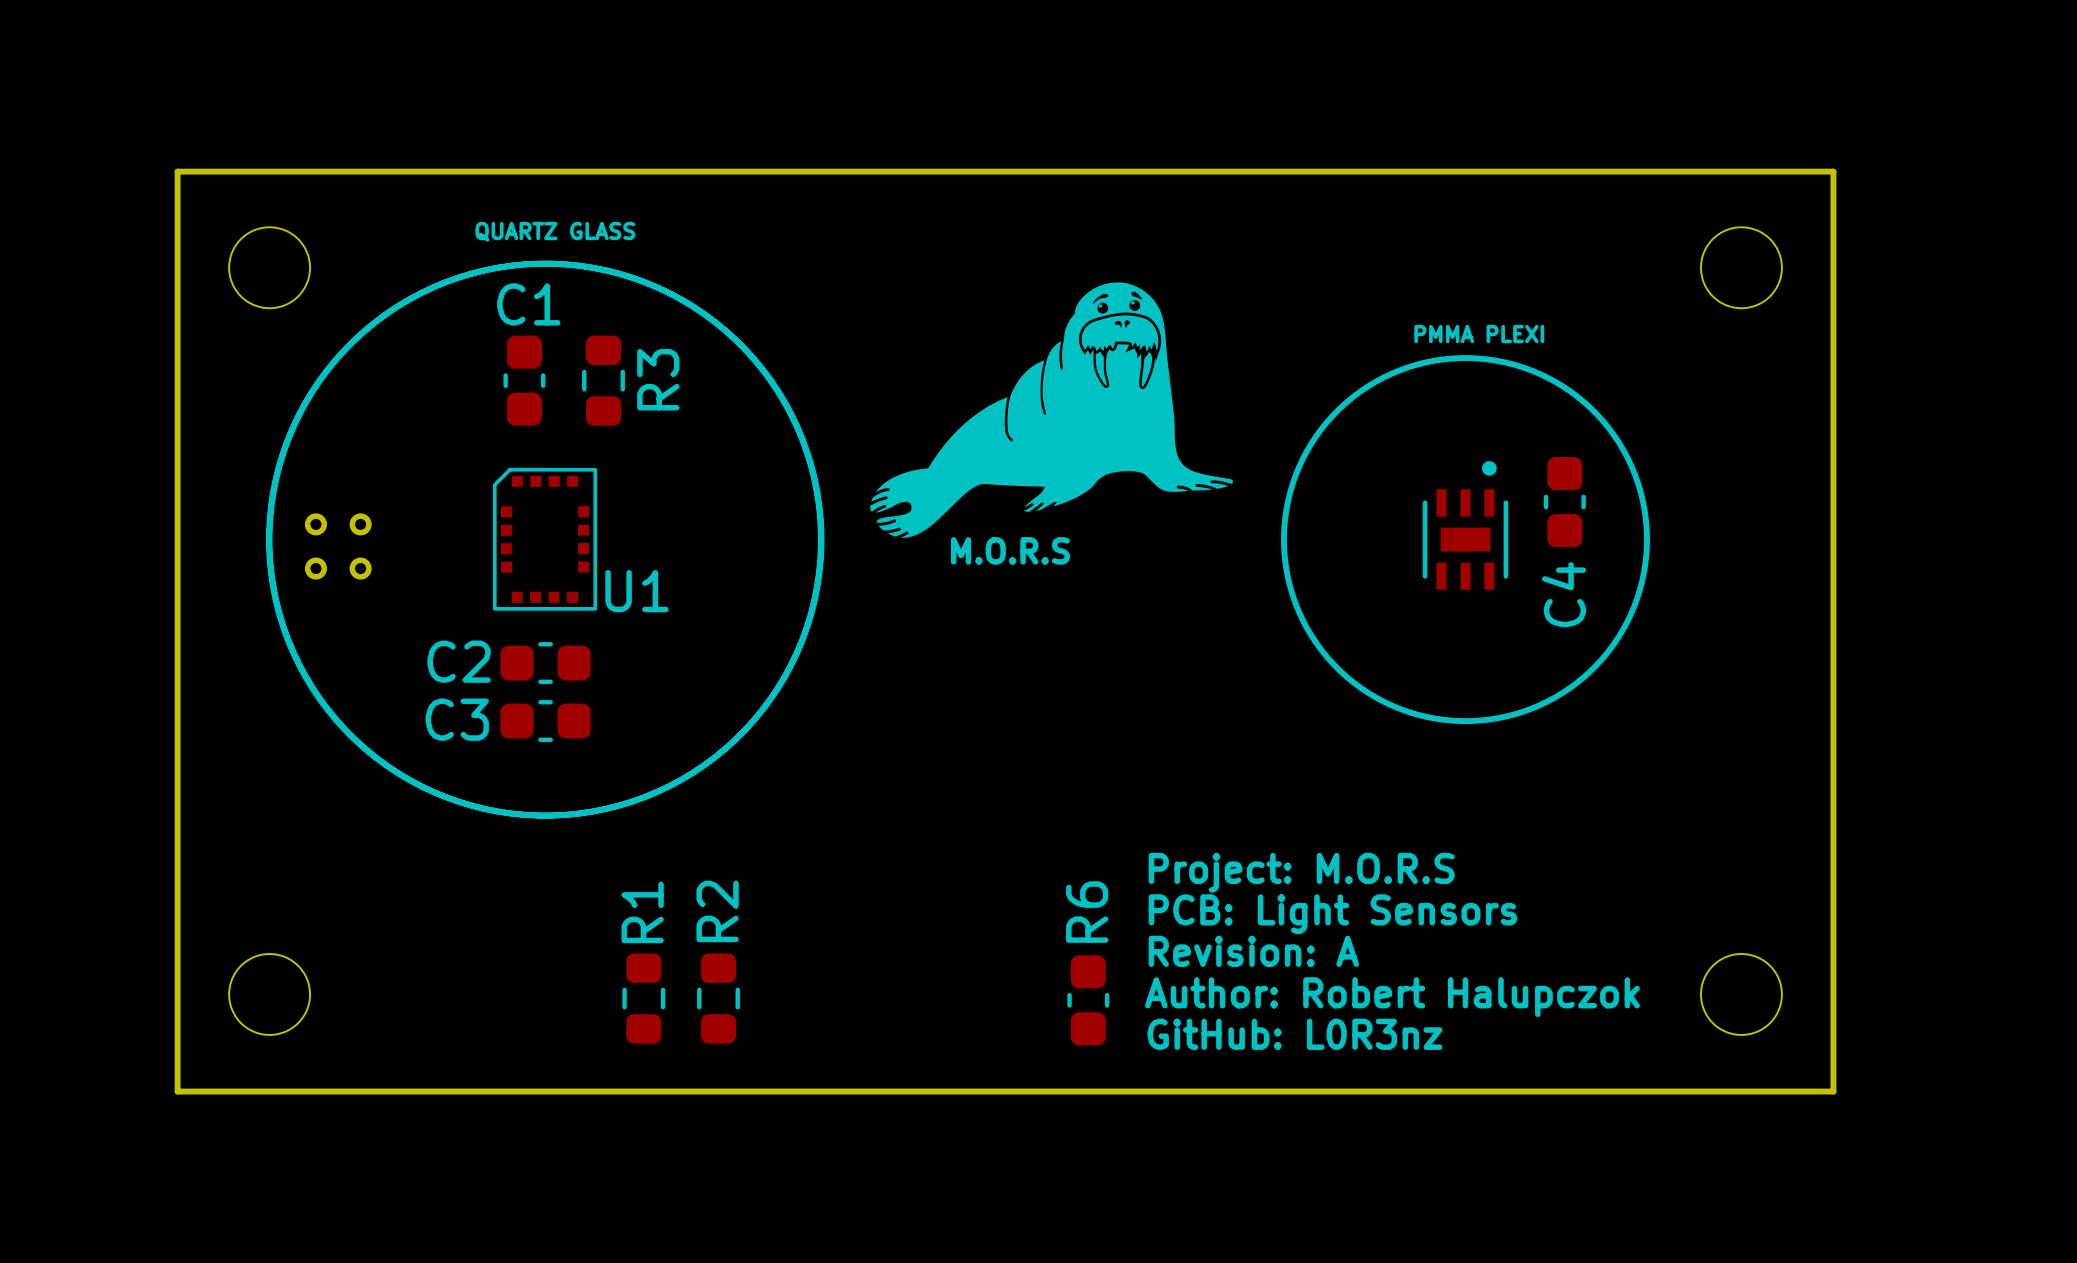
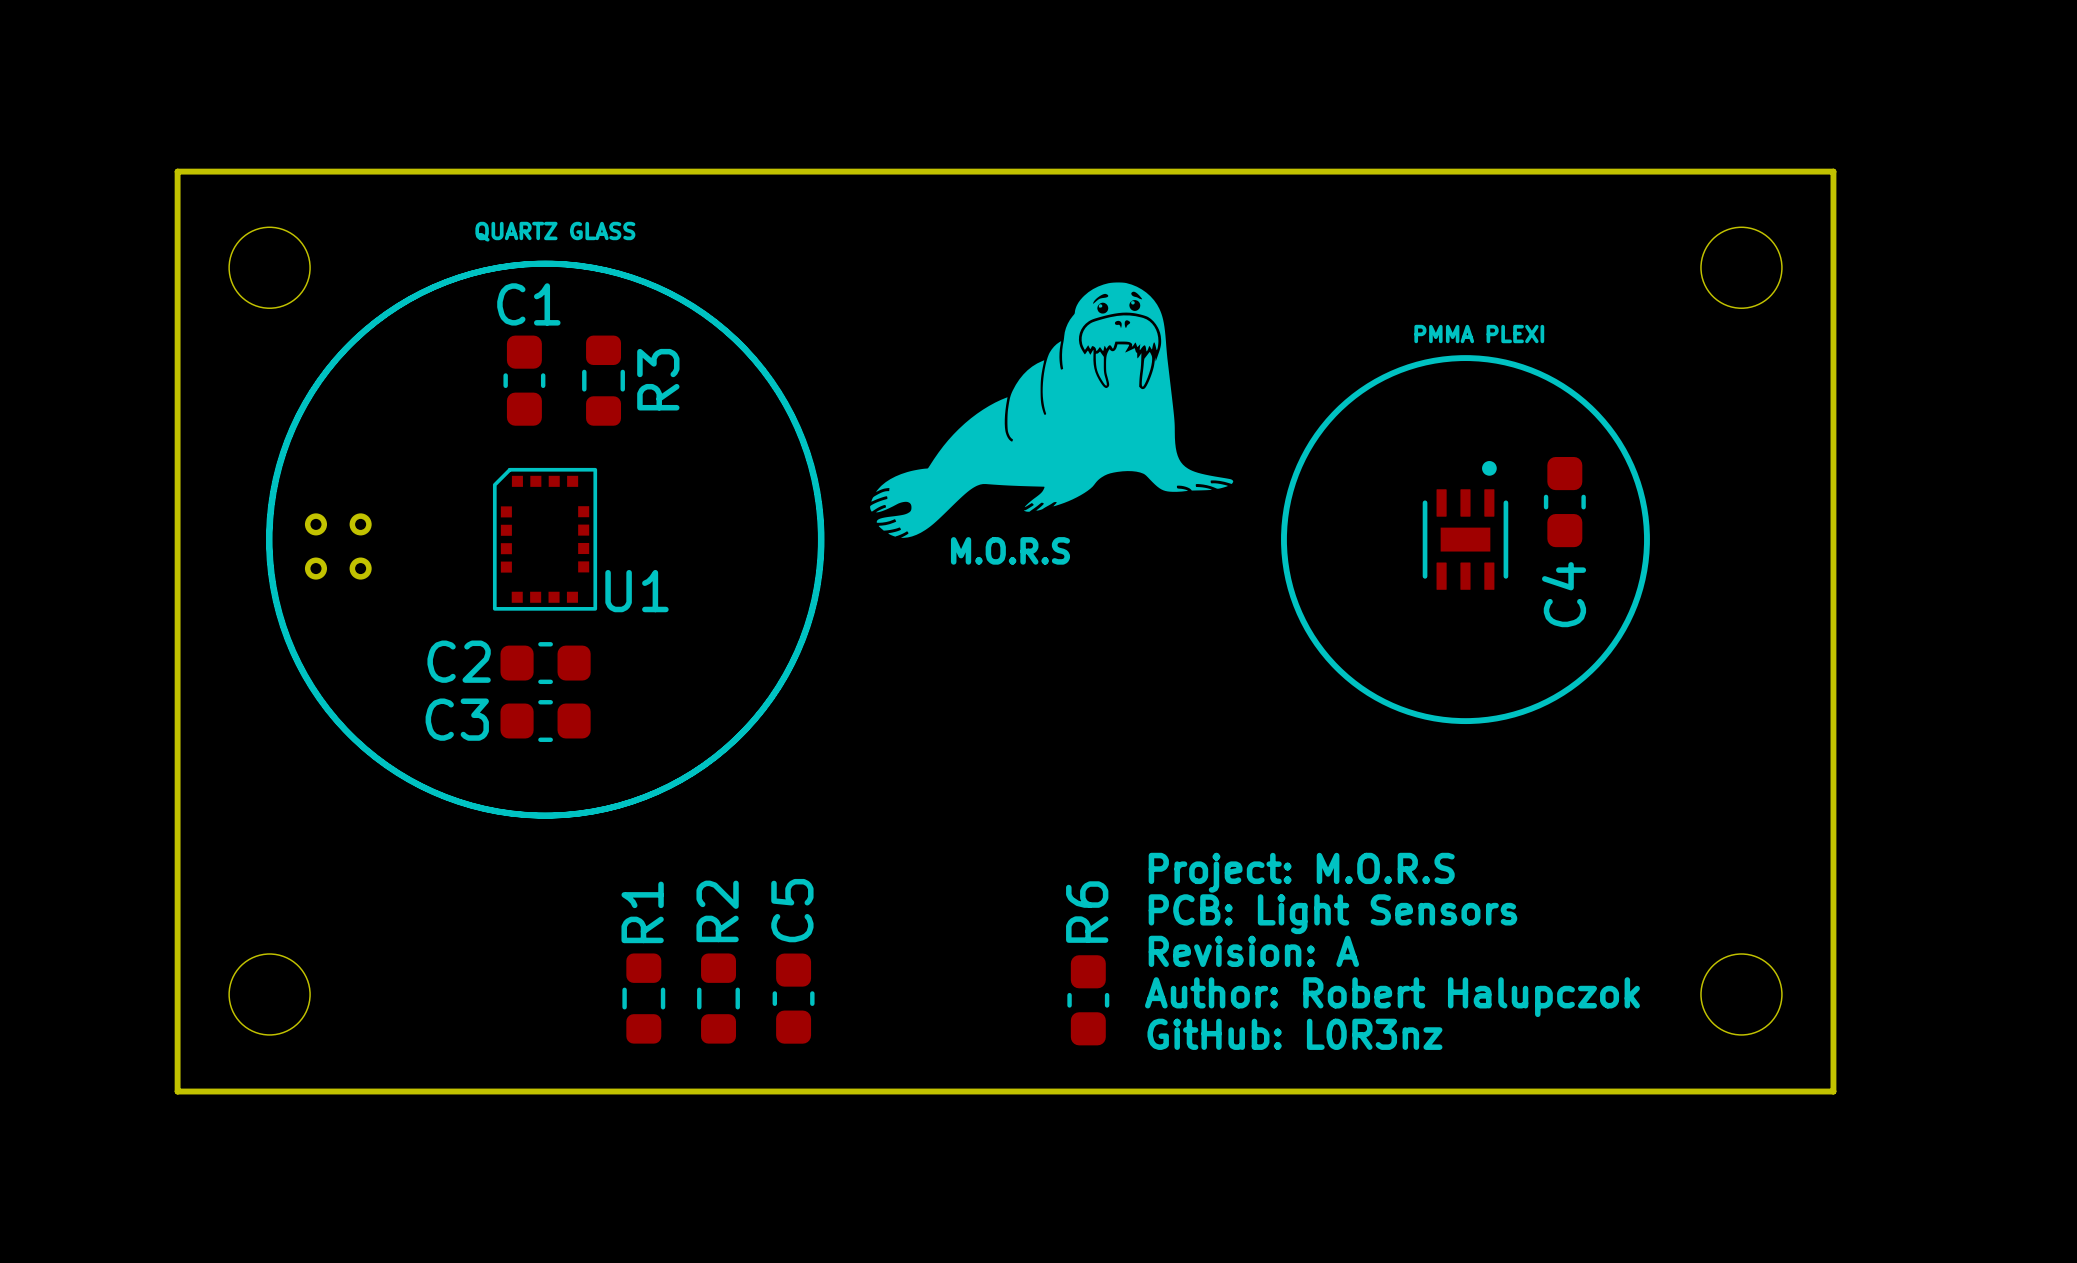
C5: none -> (793, 998)

